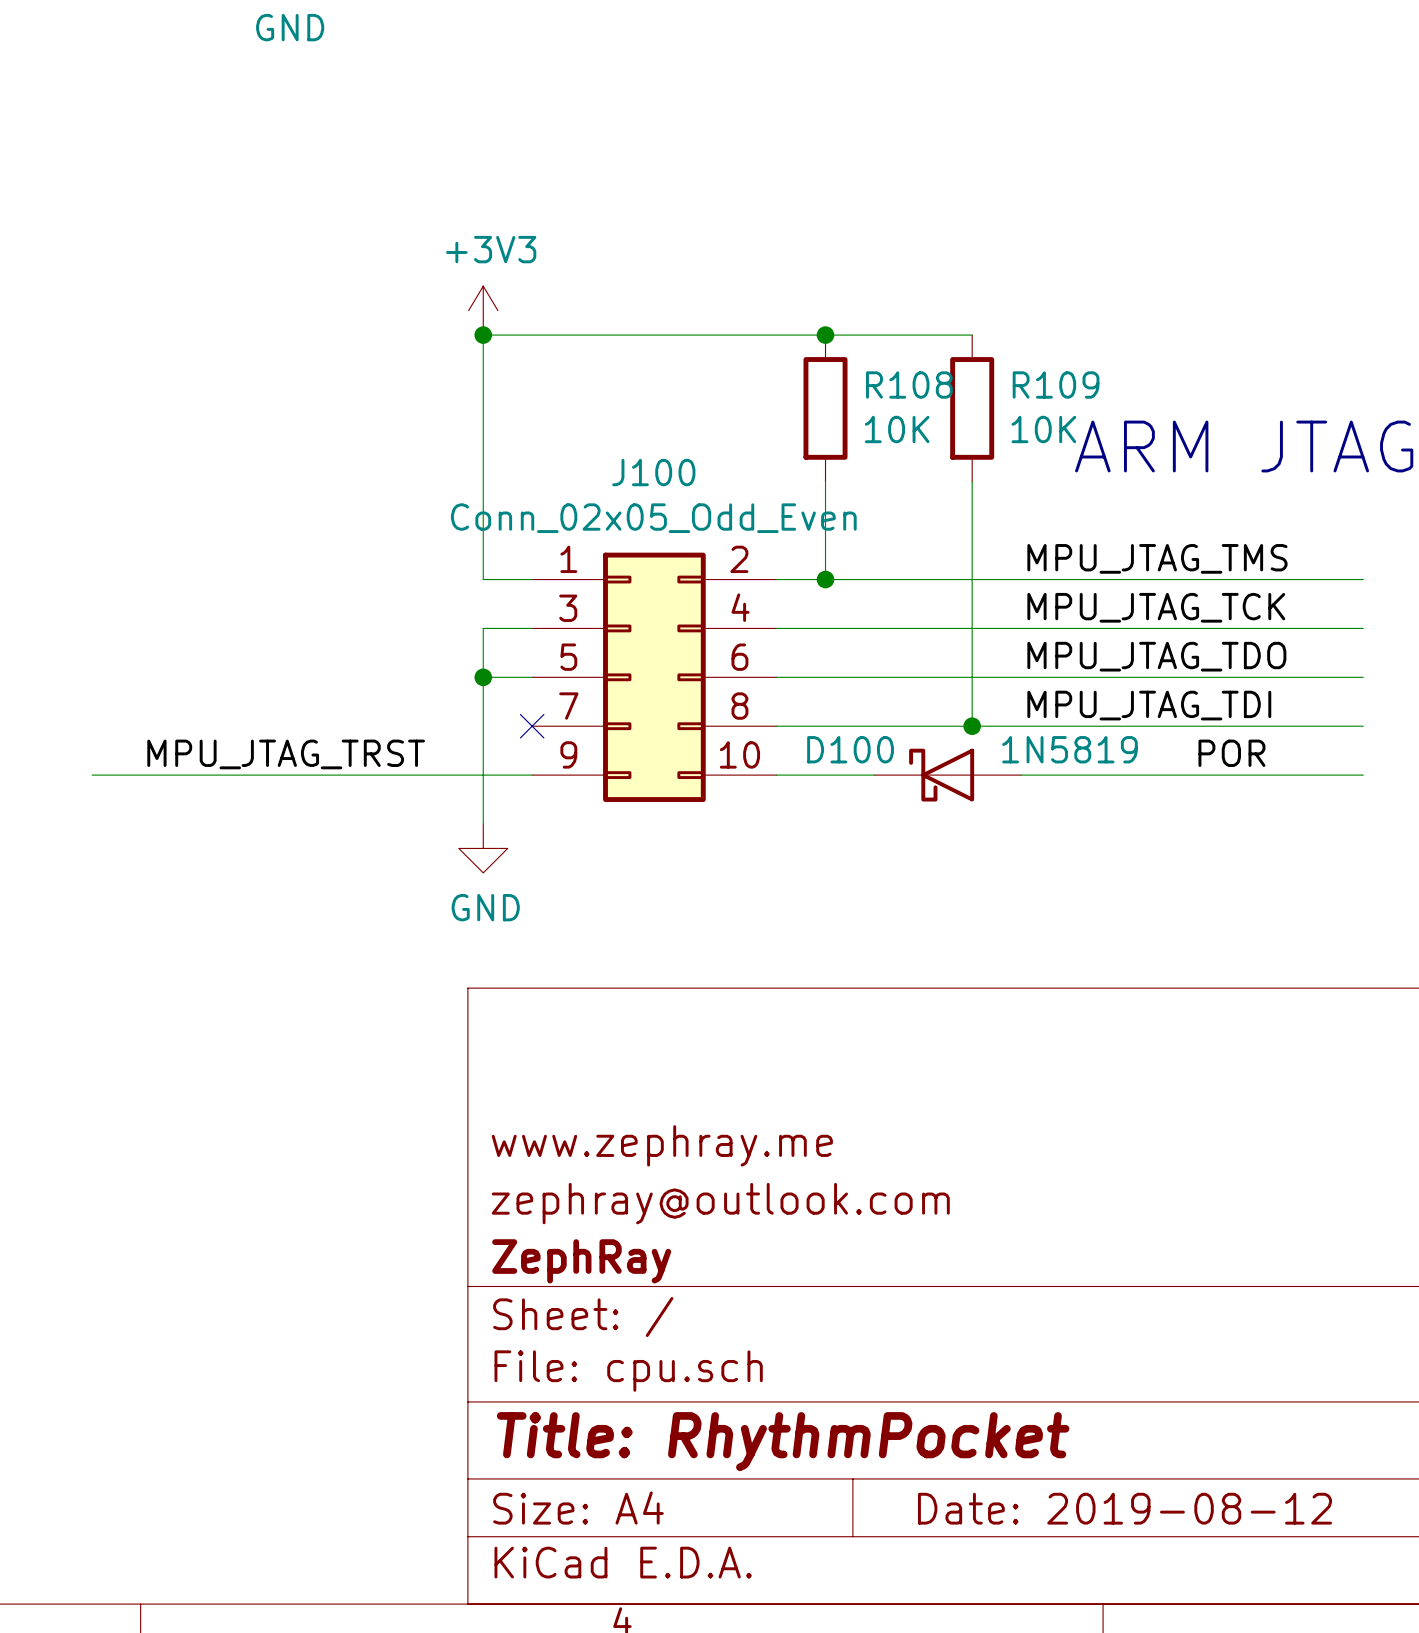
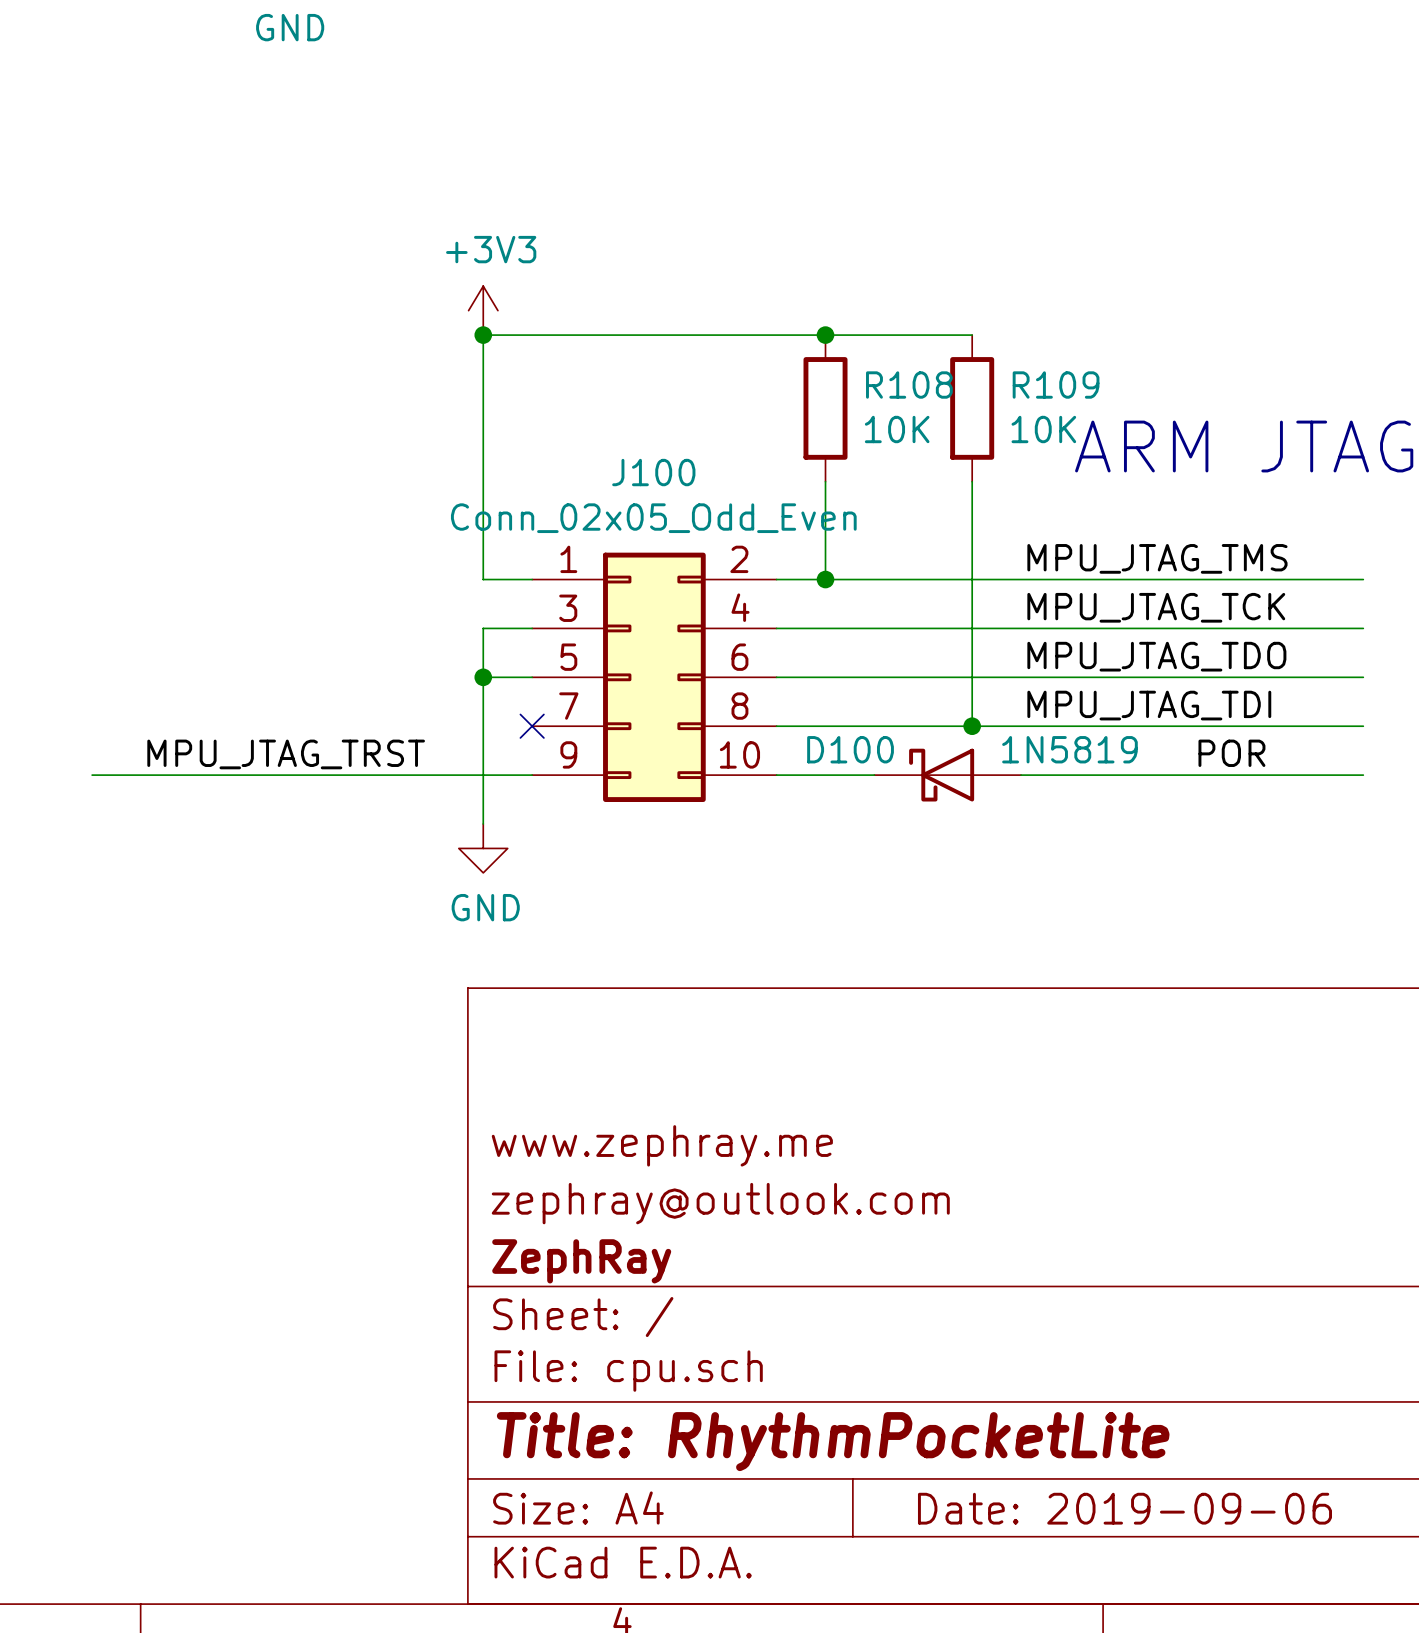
title block: Title: RhythmPocket (783, 1441) -> Title: RhythmPocketLite (833, 1441)
title block: Date: 2019-08-12 (1124, 1508) -> Date: 2019-09-06 (1124, 1508)

